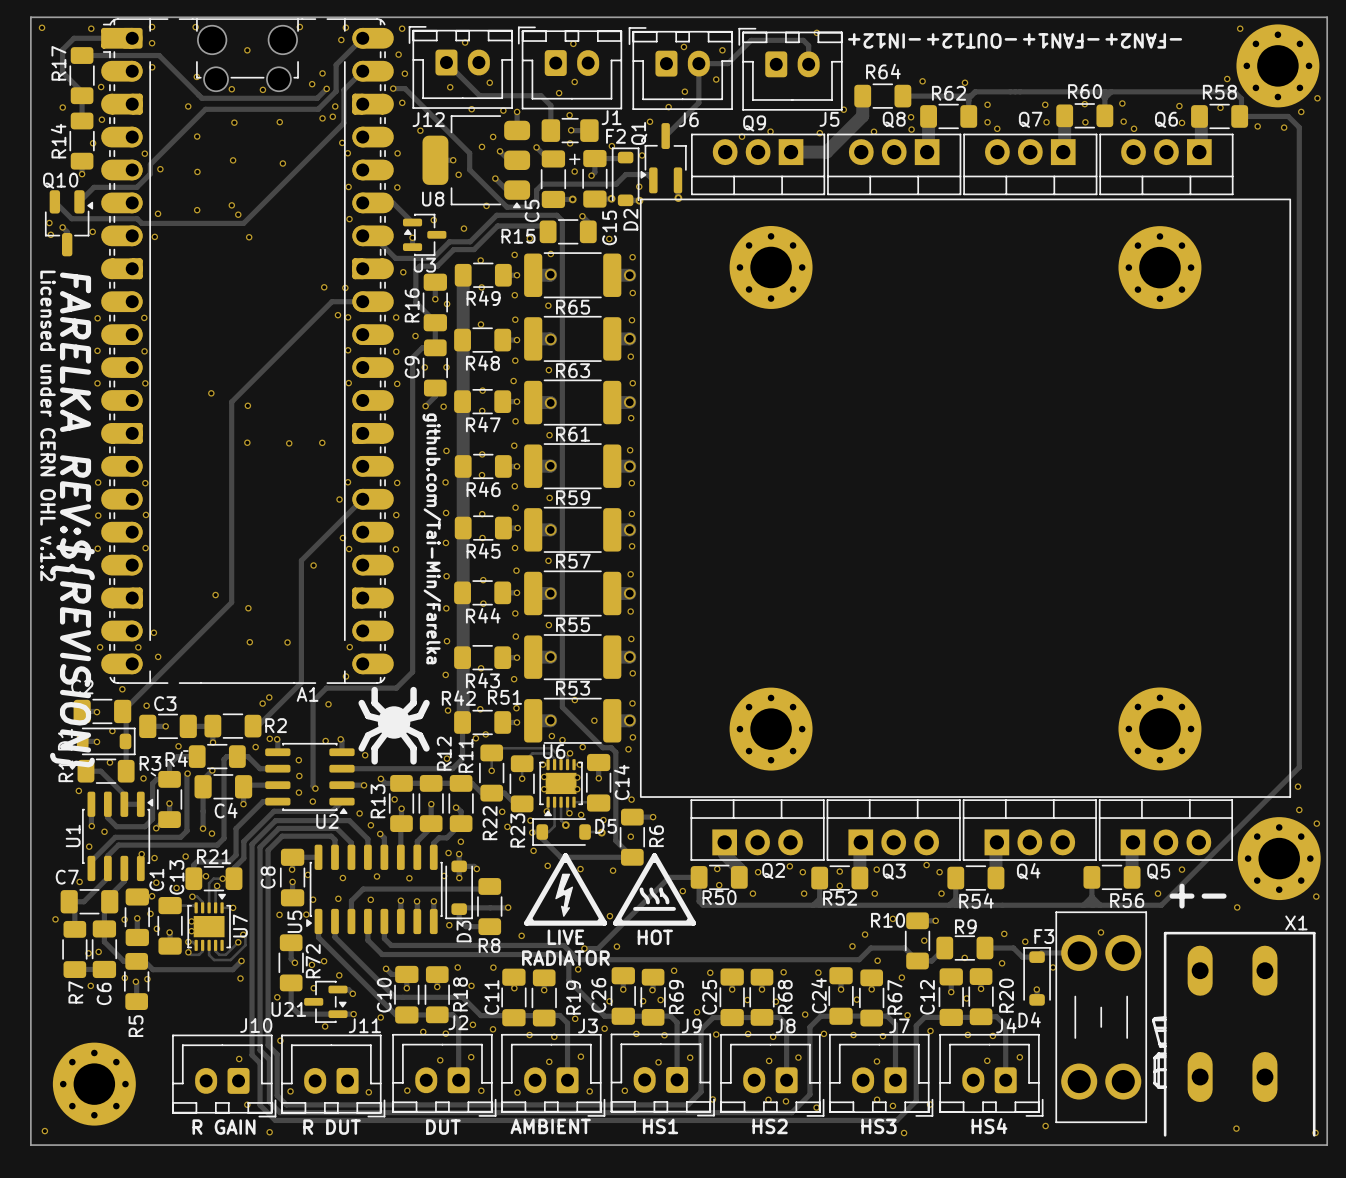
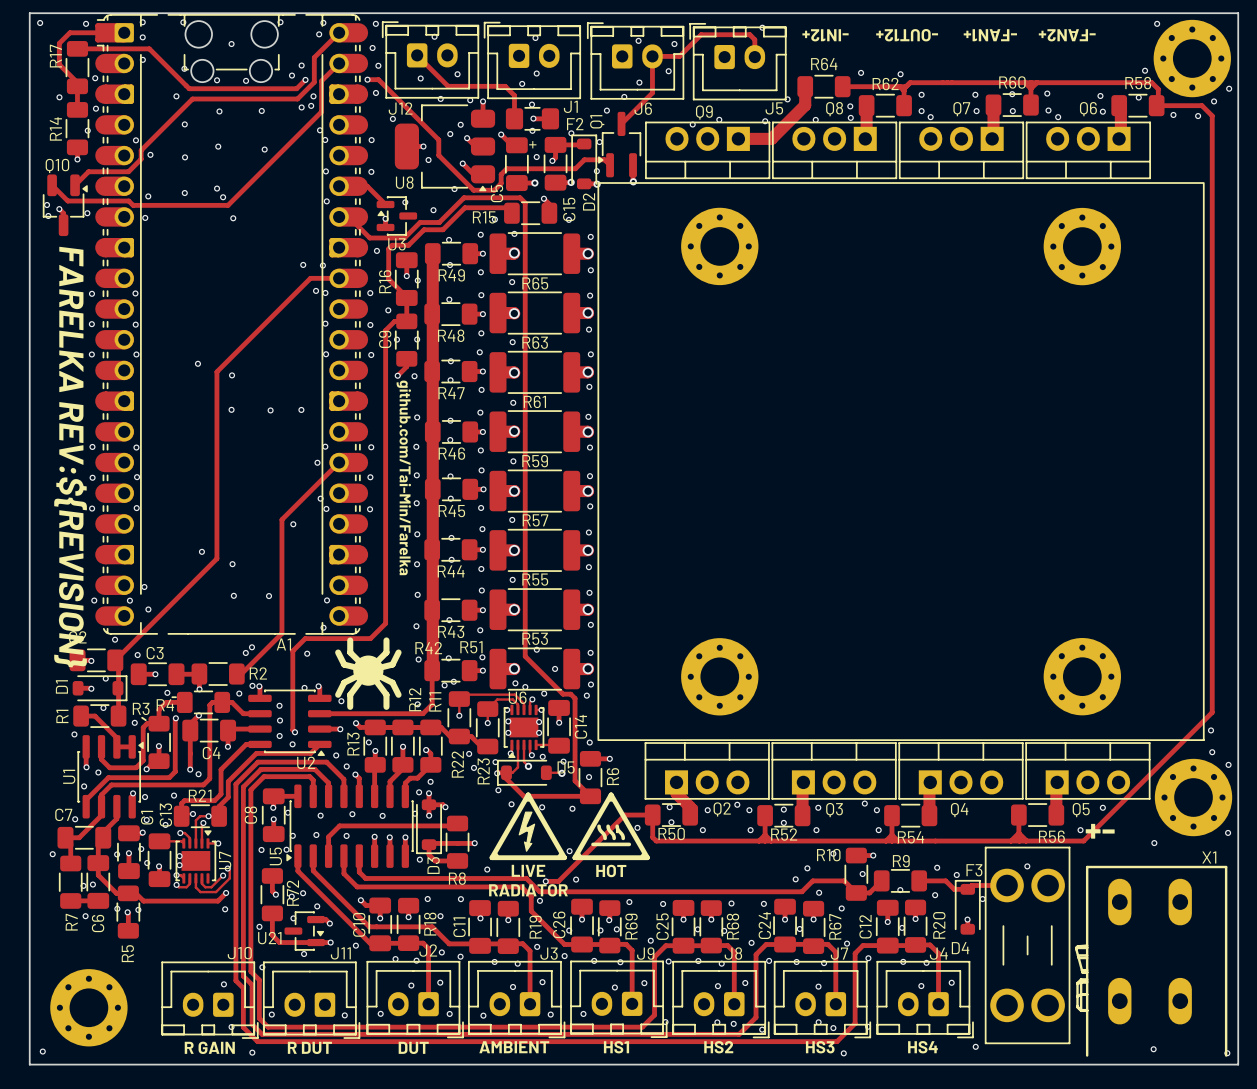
text: Licensed under CERN OHL v.1.2 (48, 425) -> none

